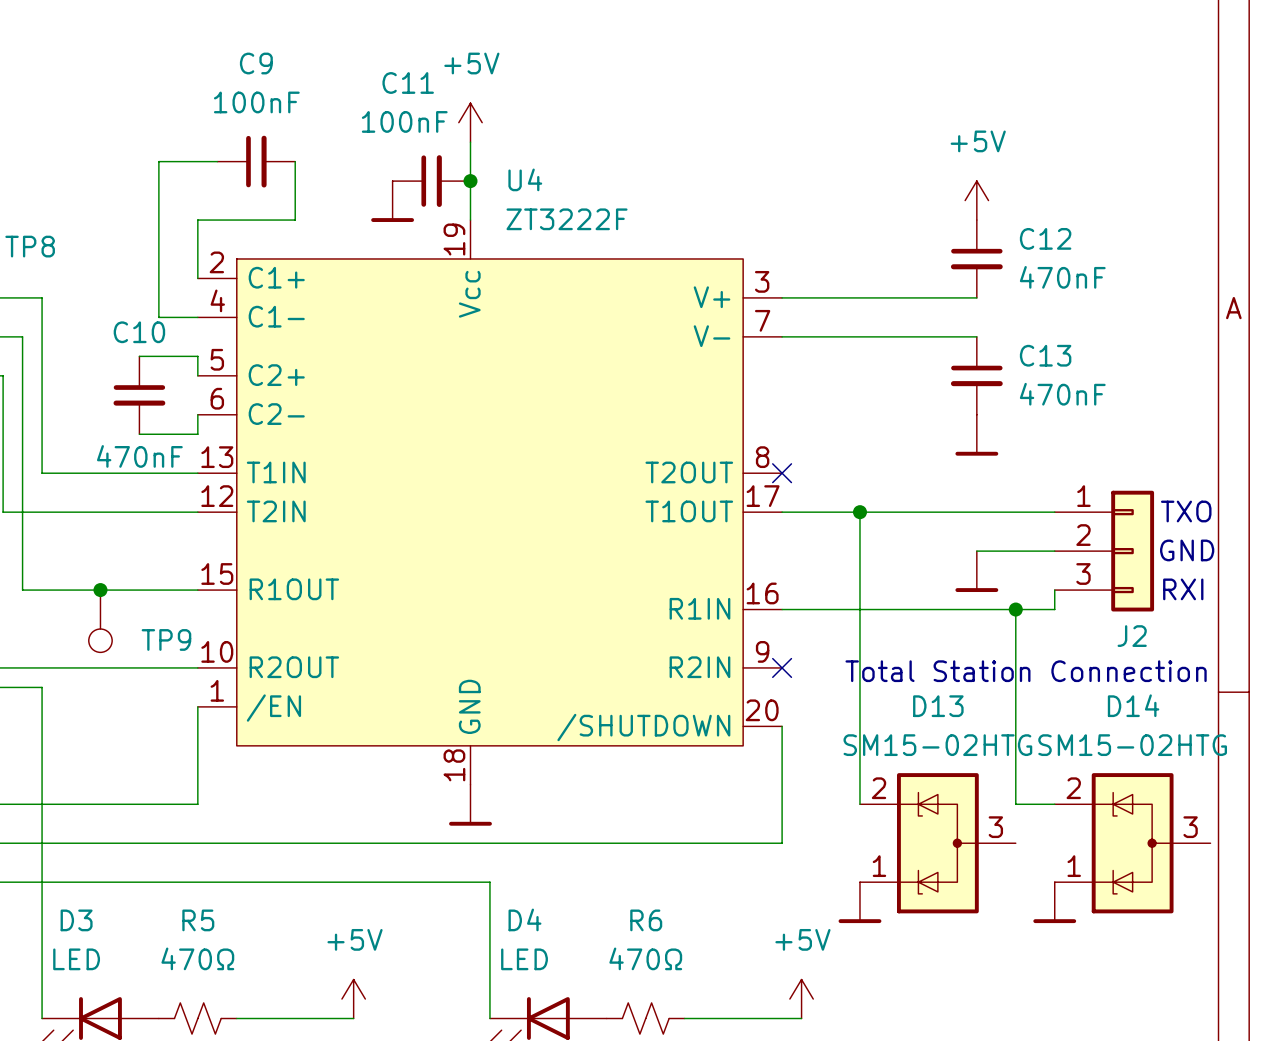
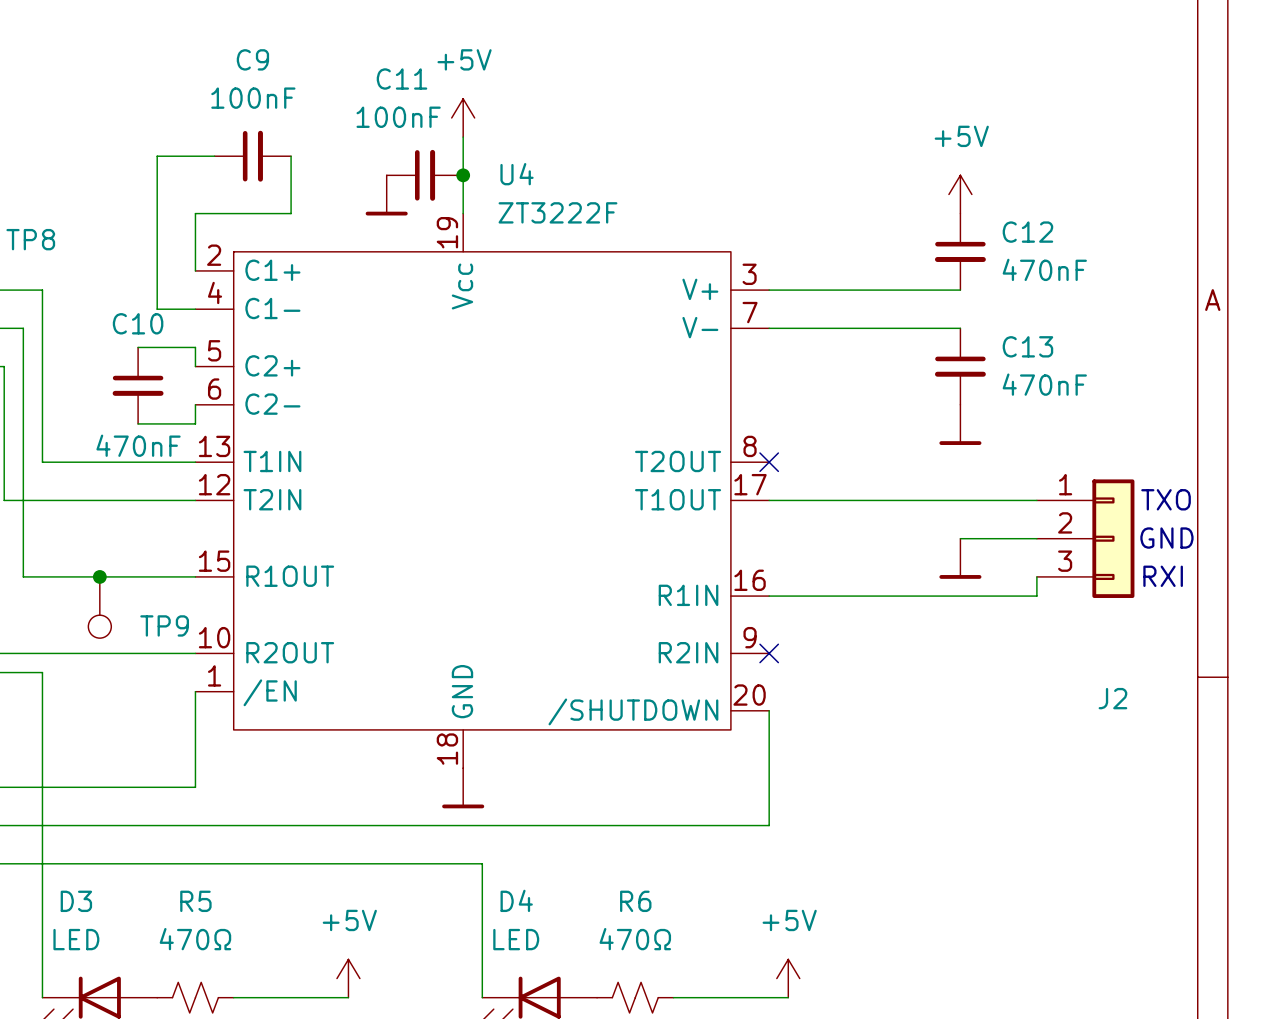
U4 symbol: [197, 220, 783, 785] -> [195, 213, 770, 769]
wire: (859, 512) (859, 804) -> none
junction: (859, 512) -> none
wire: (1015, 609) (1015, 804) (1054, 804) -> none
junction: (1015, 609) -> none
J2 name position: J2 (1132, 636) -> J2 (1112, 698)
text: Total Station Connection (1026, 671) -> none
D13: SM15-02HTG (937, 843) -> none
D14: SM15-02HTG (1132, 843) -> none
power symbol: (859, 902) -> none
power symbol: (1054, 902) -> none

